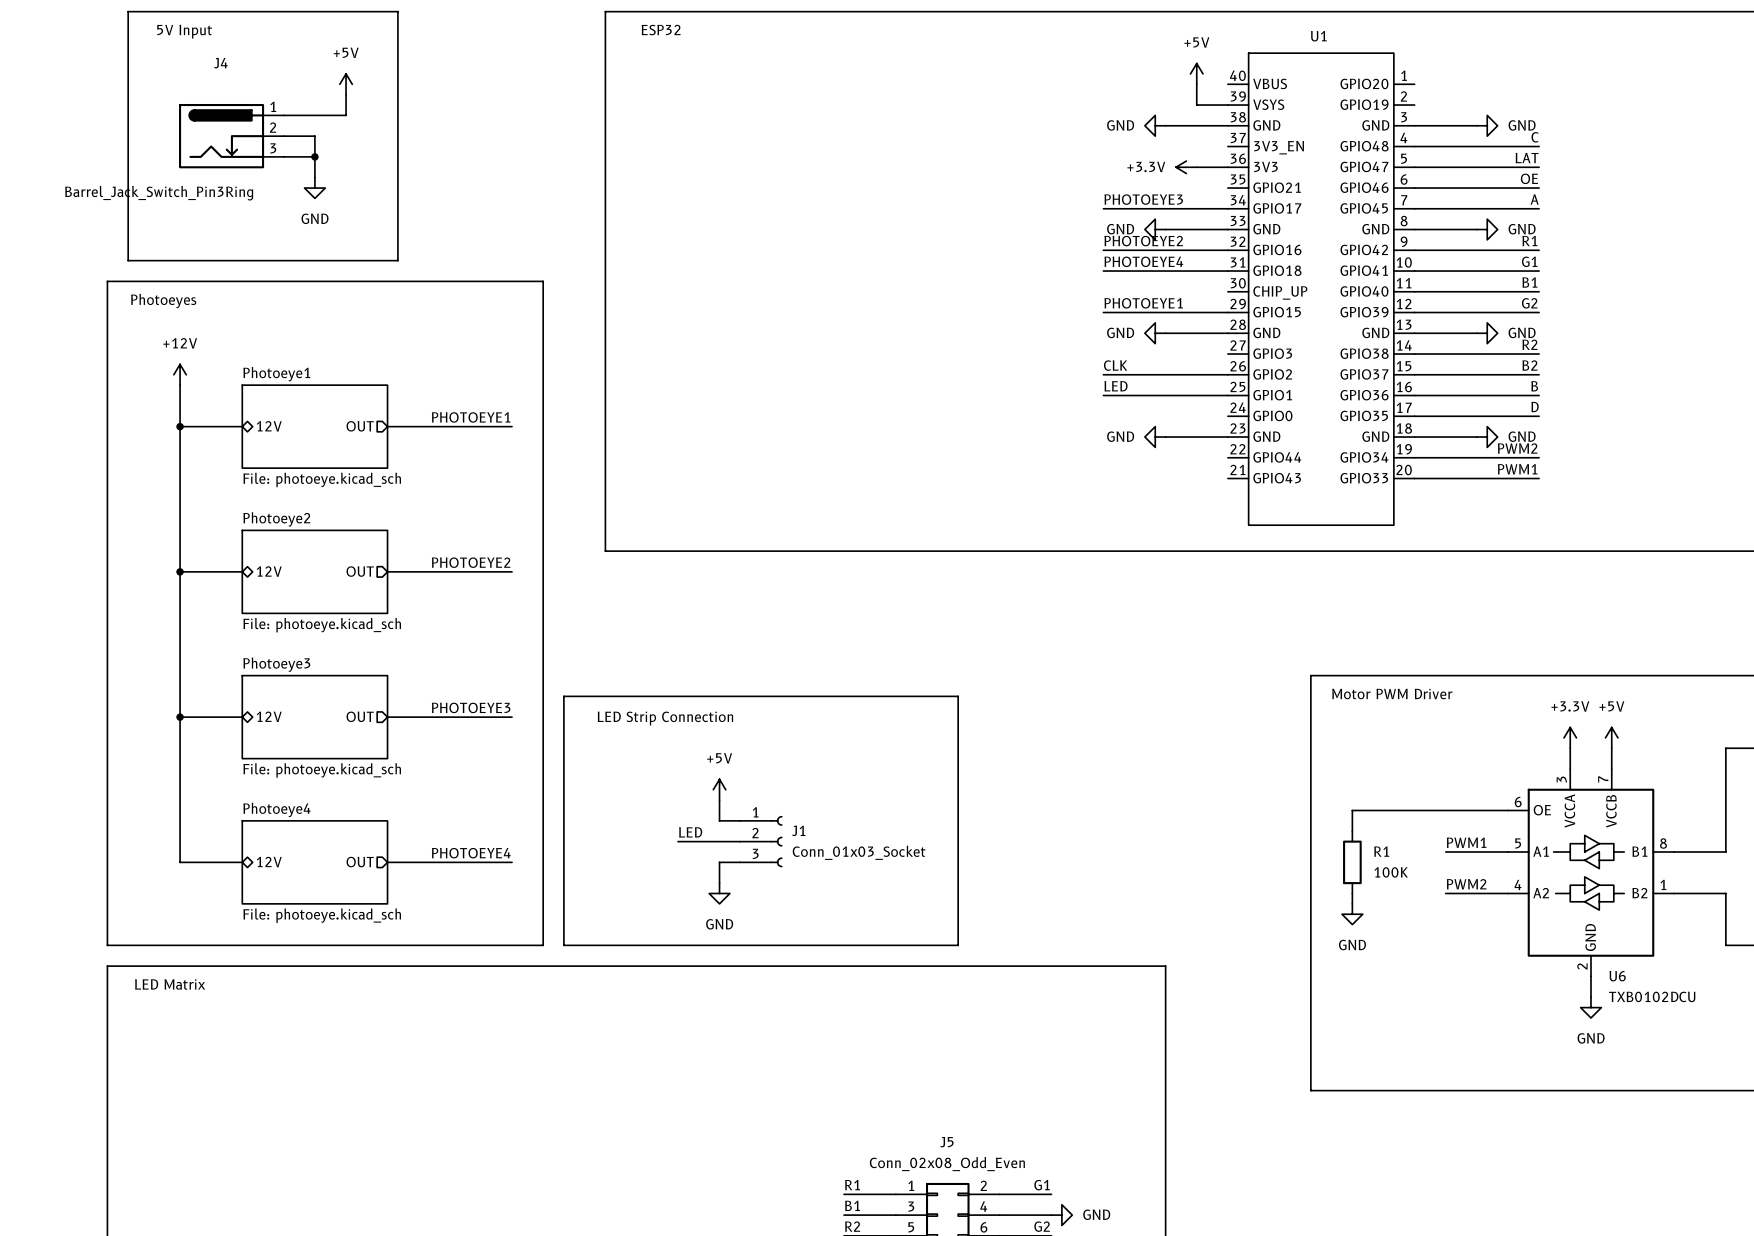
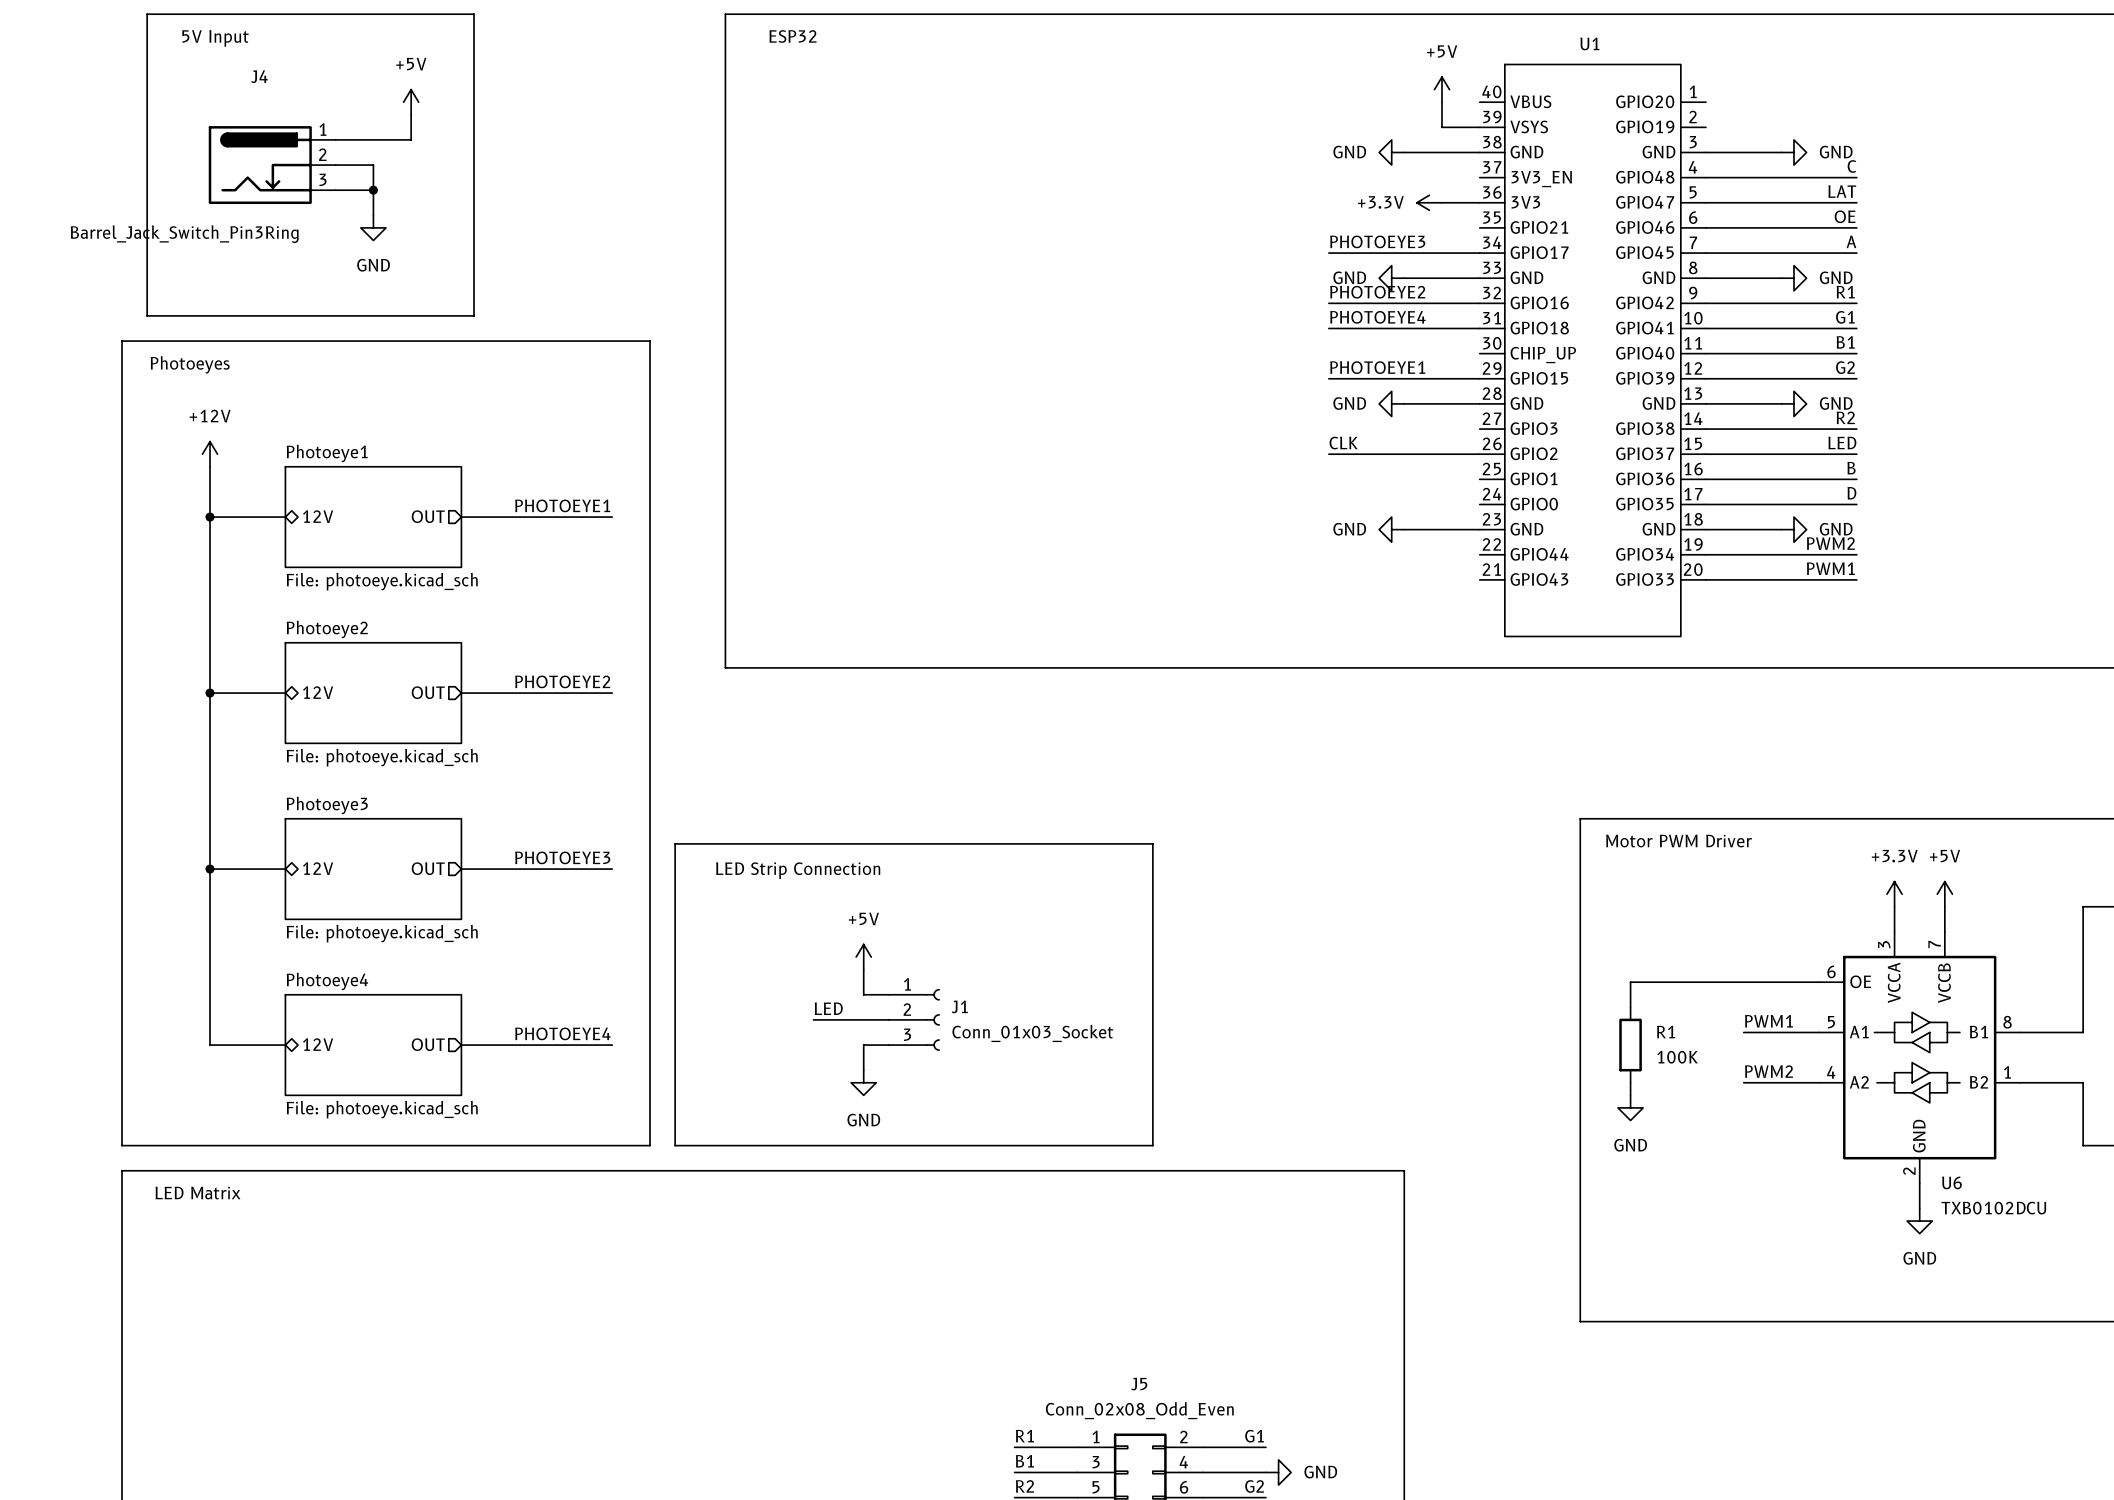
label: B2 (1529, 365) -> LED (1842, 442)
label: LED (1116, 386) -> none
wire: (1103, 395) (1227, 395) -> none

